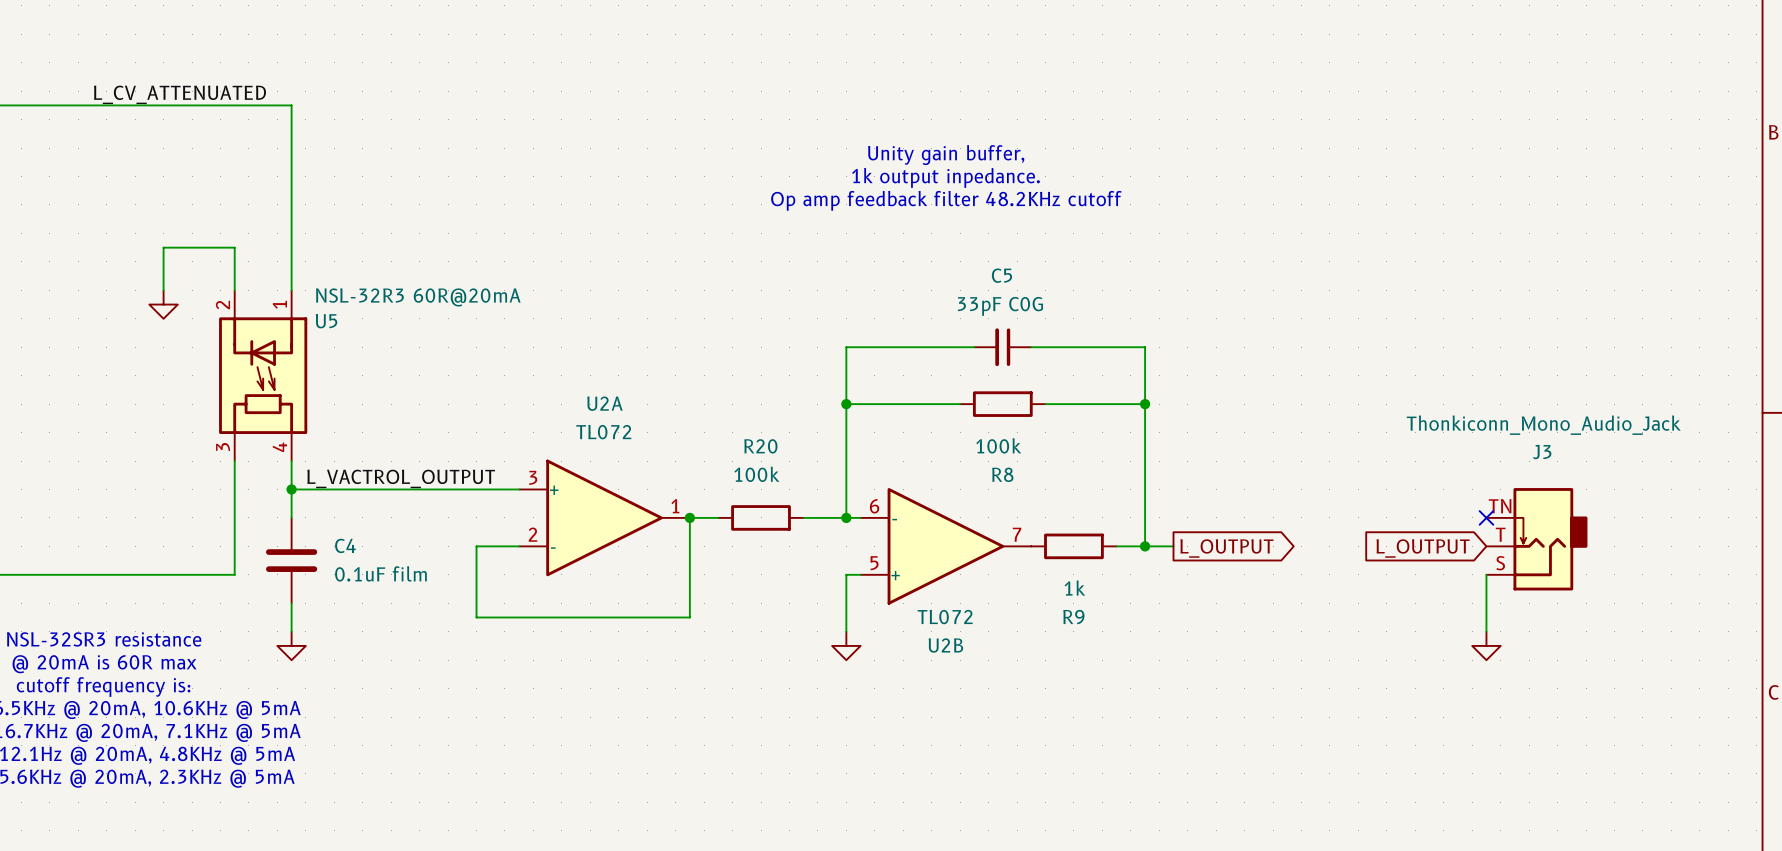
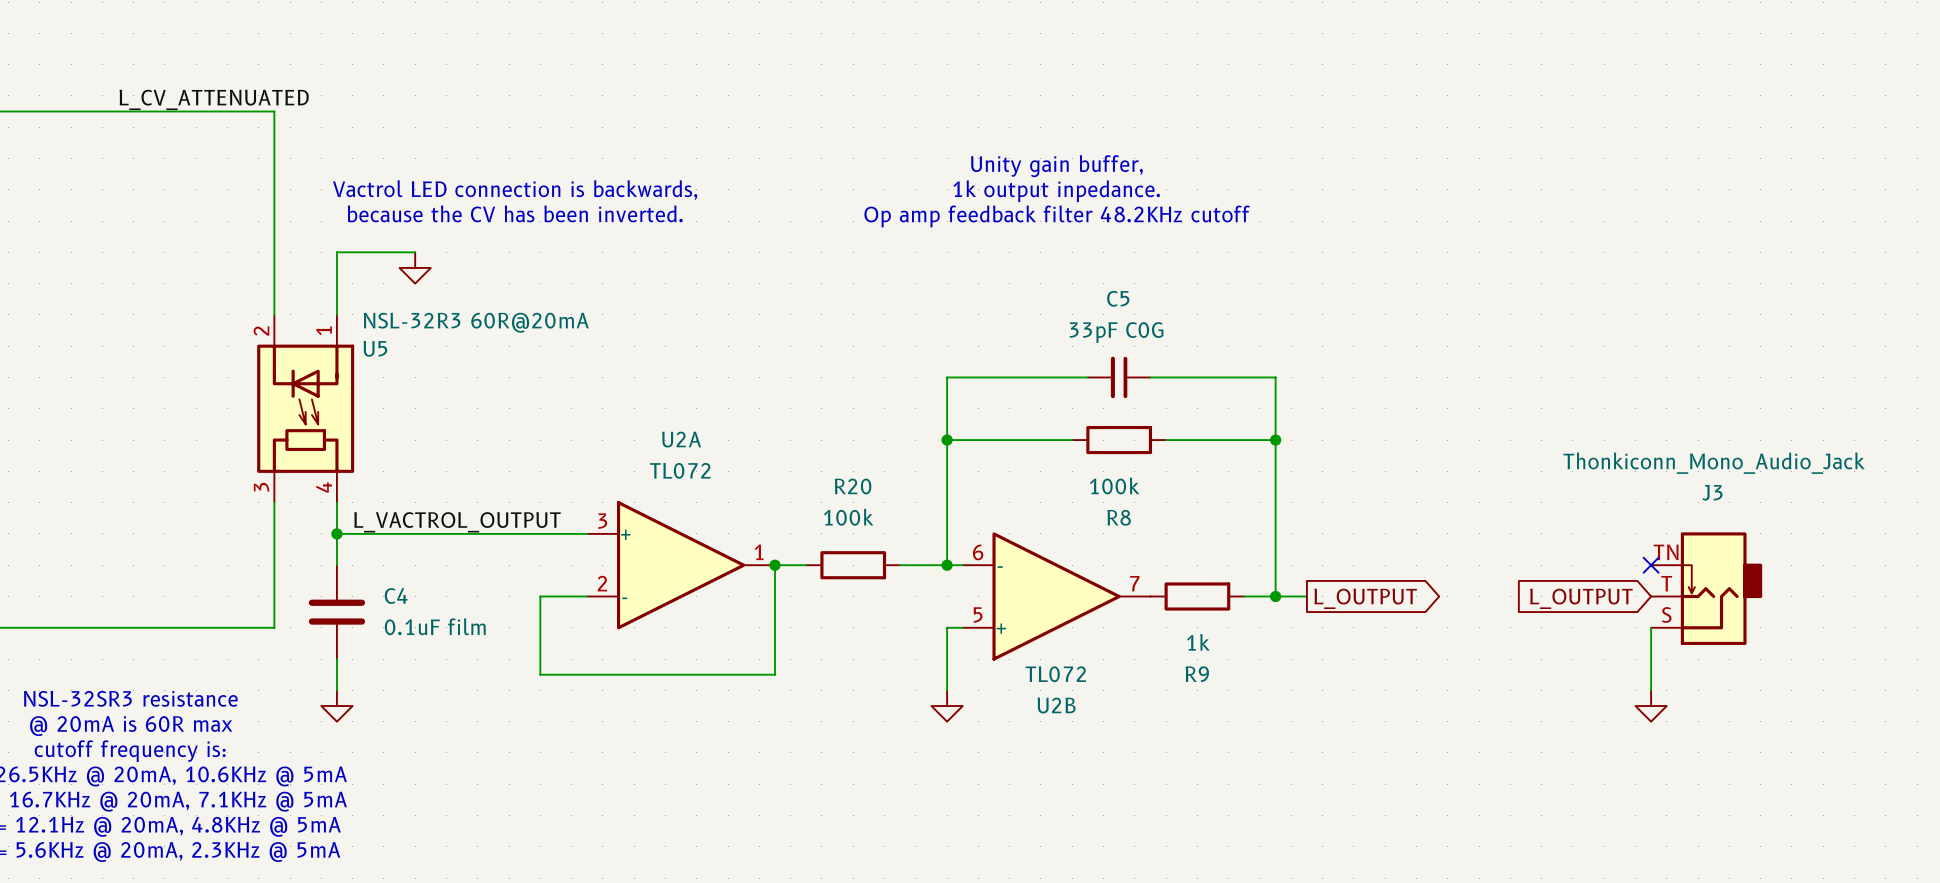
wire: (234, 105) (291, 105) (291, 233) -> (274, 111) (274, 267)
text: none -> Vactrol LED connection is backwards, (515, 190)
text: none -> because the CV has been inverted. (515, 213)
wire: none -> (336, 252) (415, 252)
wire: (234, 247) (163, 247) (163, 290) -> none
power symbol position: (163, 304) -> (415, 267)

